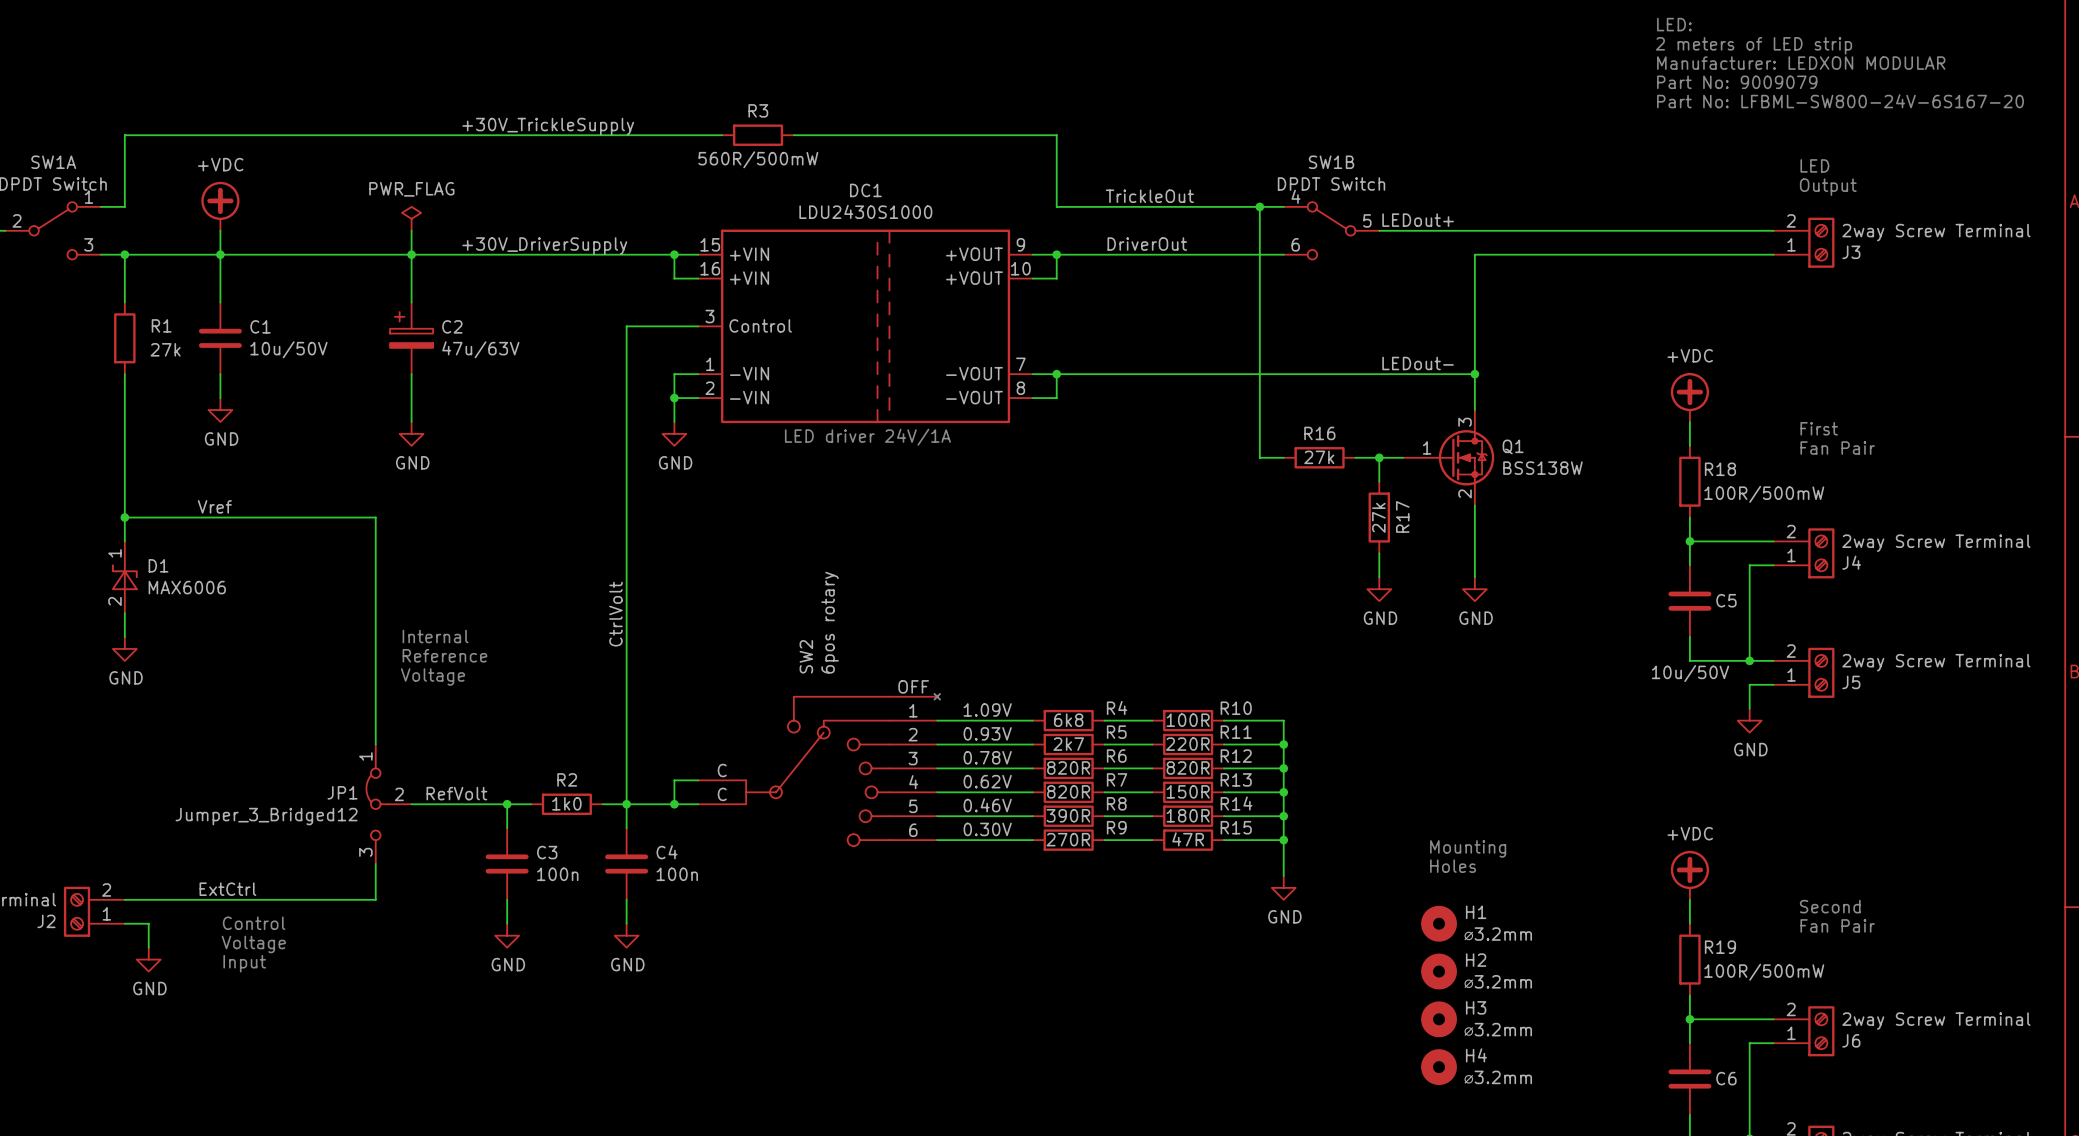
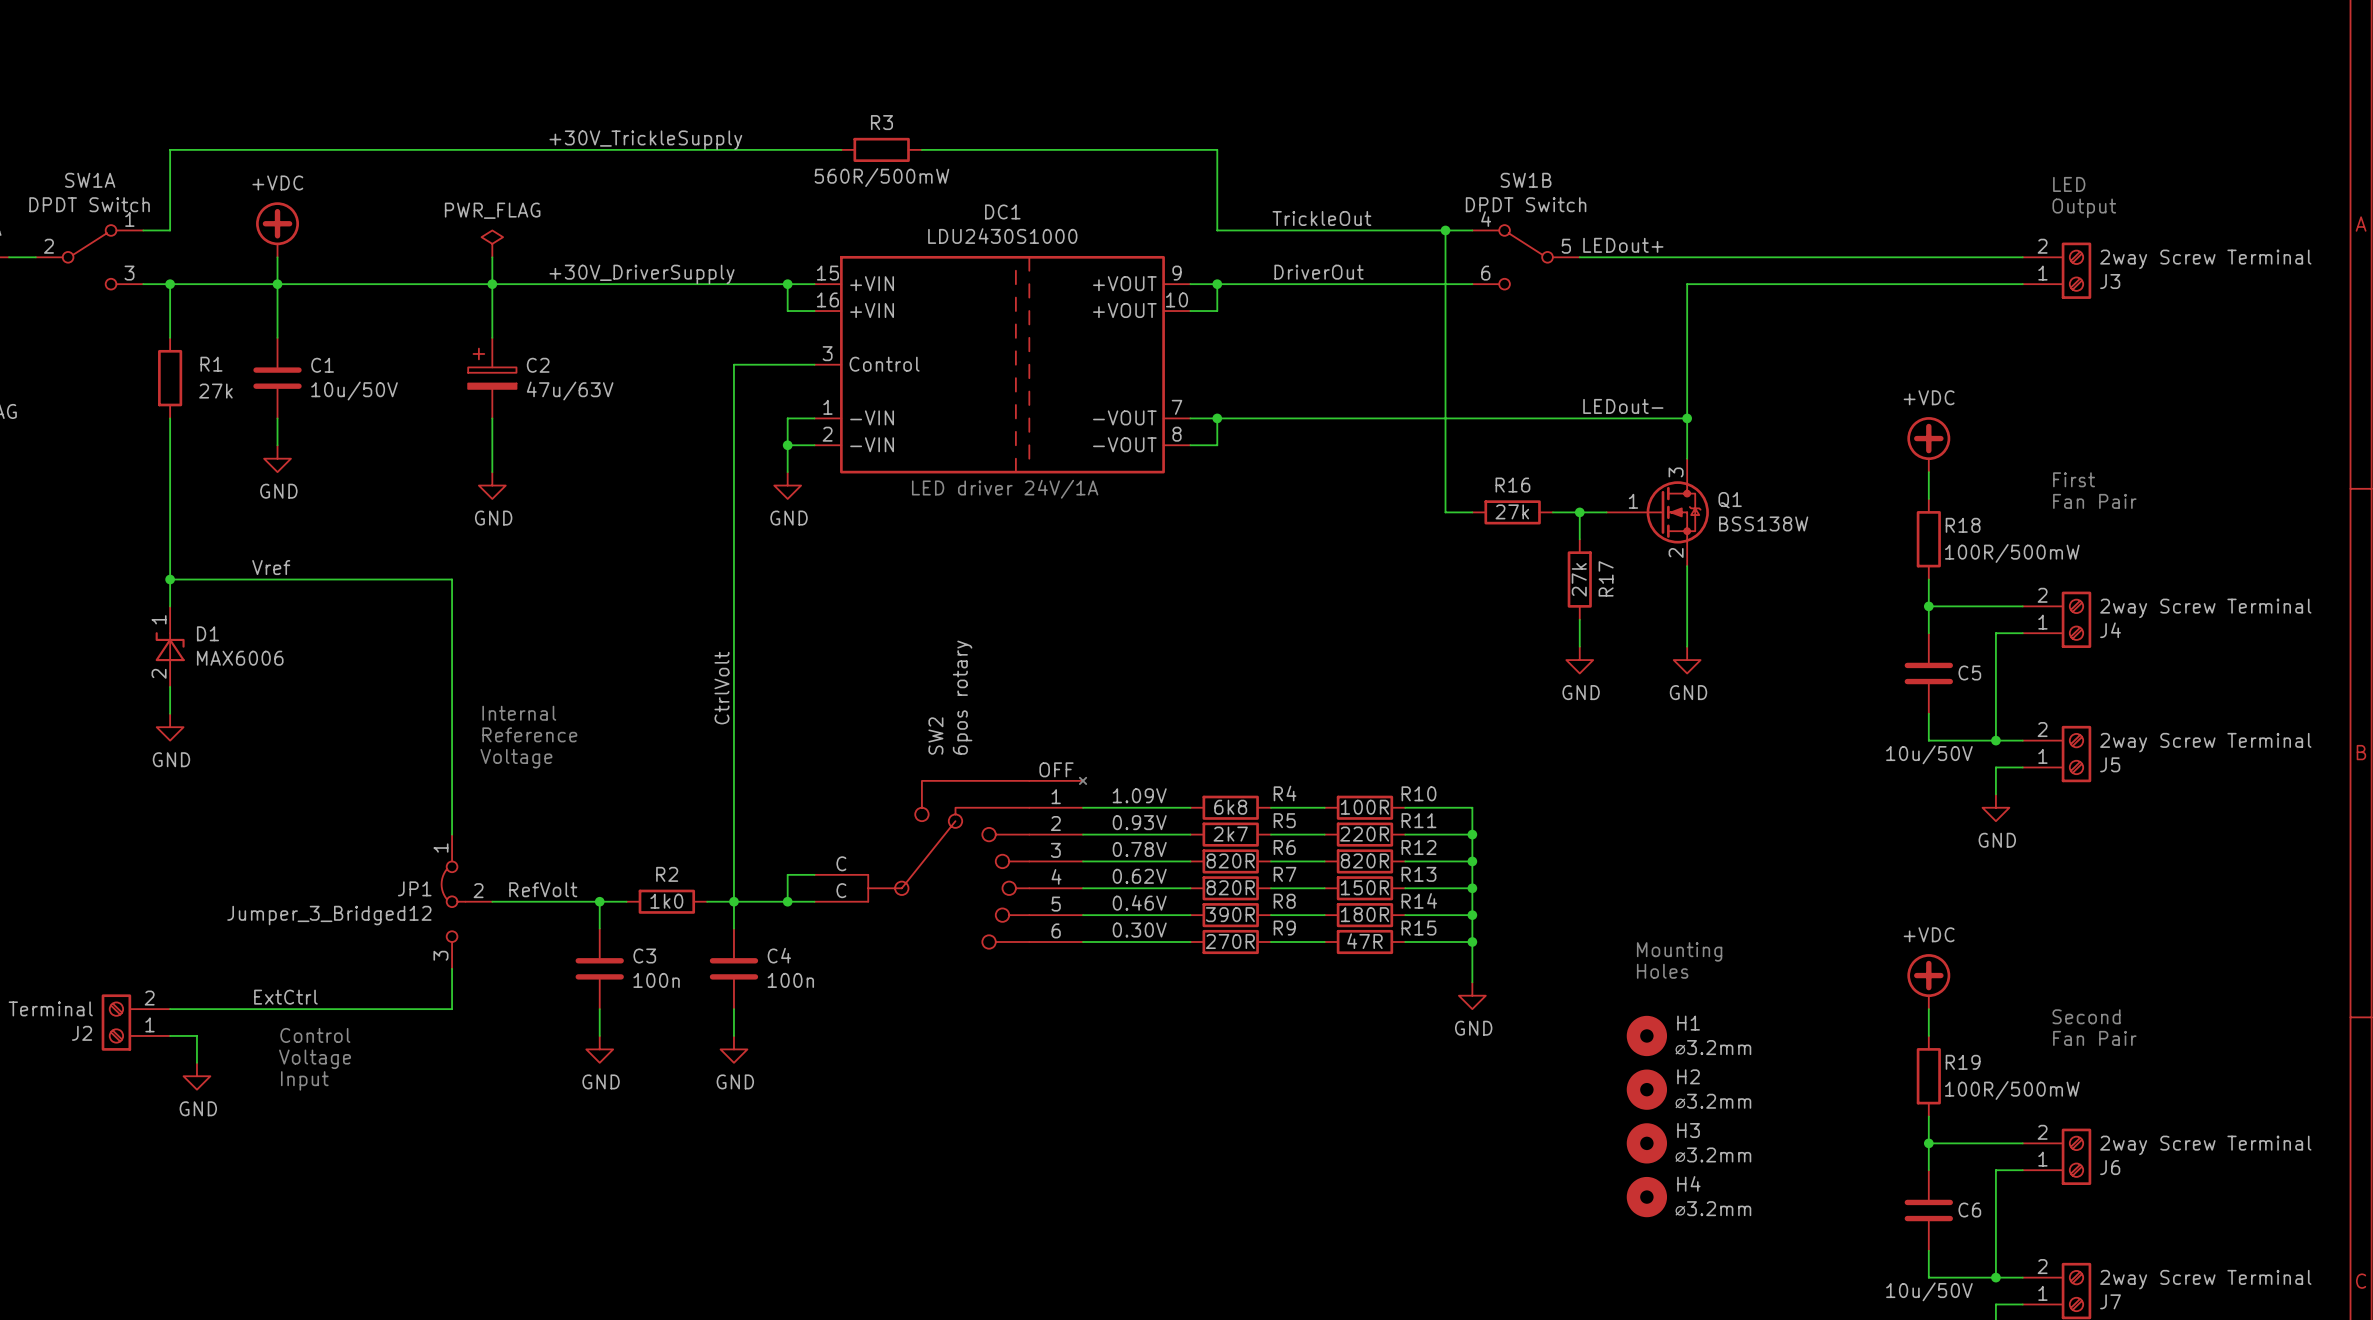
text: LED: (1674, 24) -> none
text: 2 meters of LED strip (1754, 45) -> none
text: Manufacturer: LEDXON MODULAR (1801, 63) -> none
text: Part No: 9009079 (1737, 82) -> none
text: Part No: LFBML-SW800-24V-6S167-20 (1840, 101) -> none

